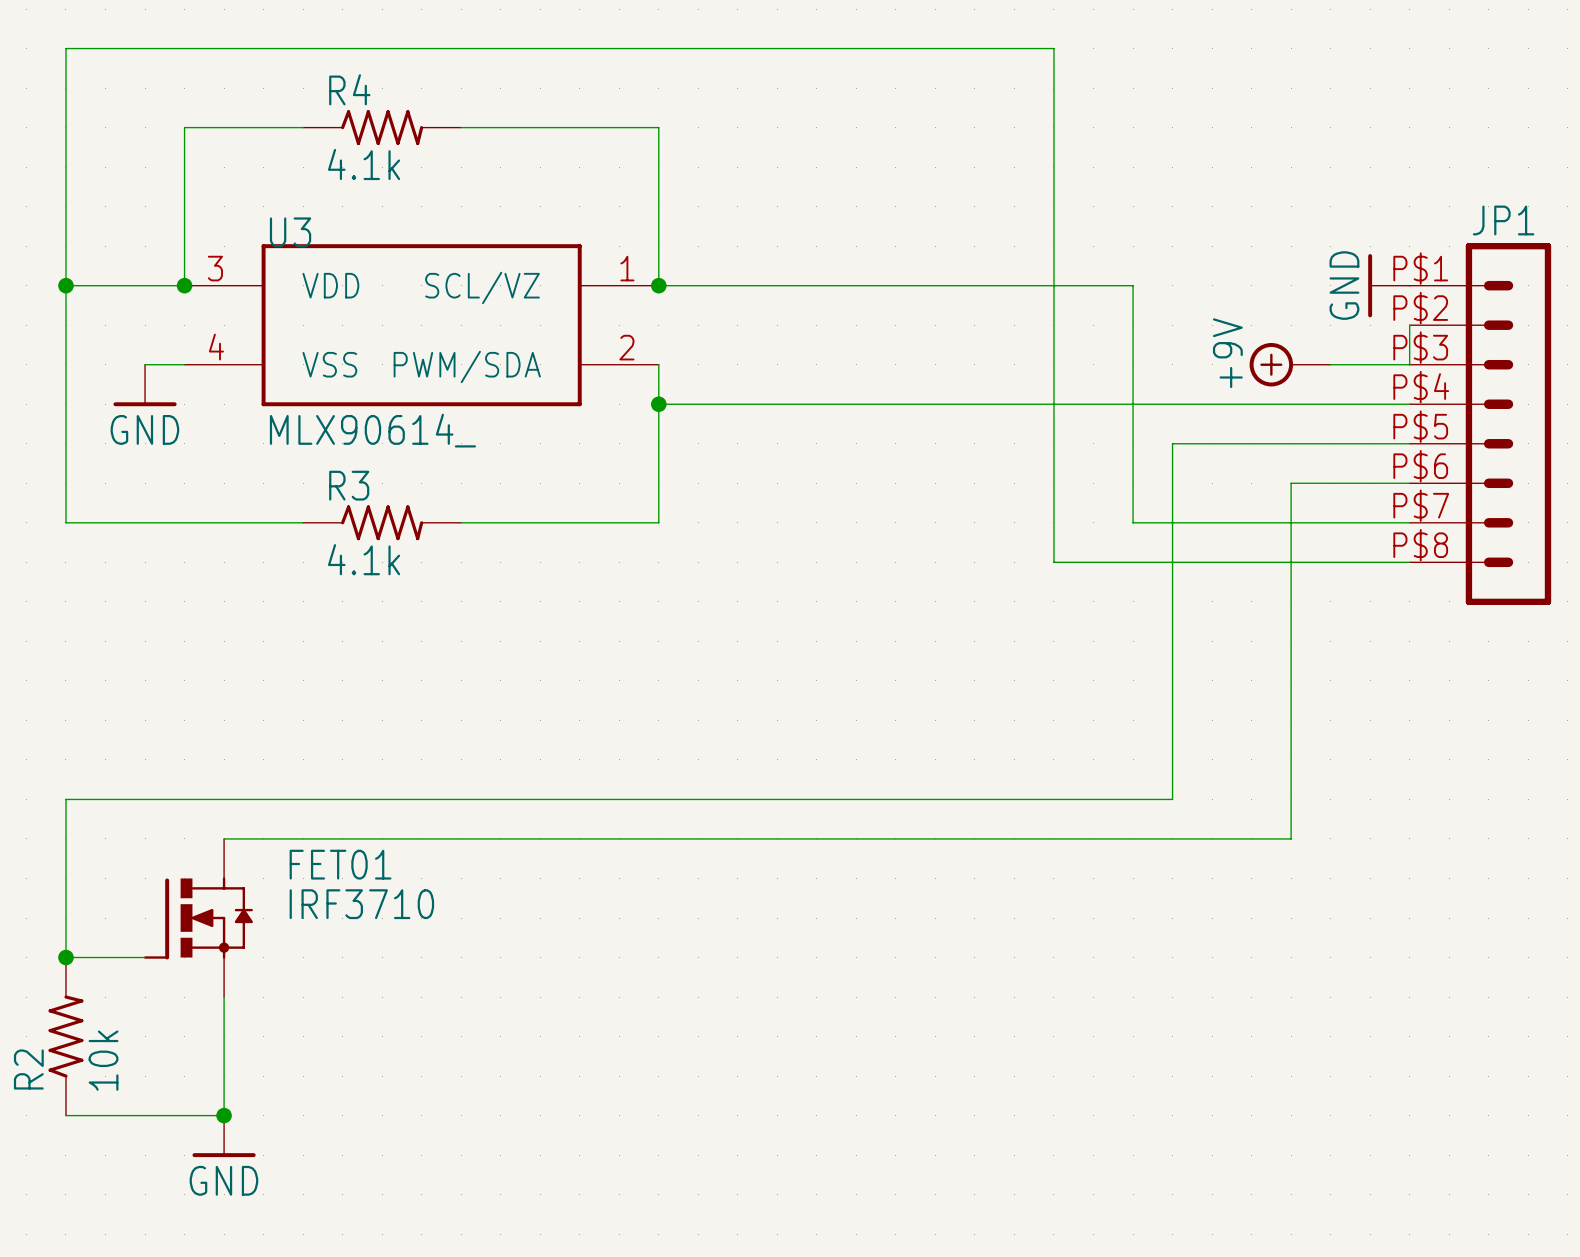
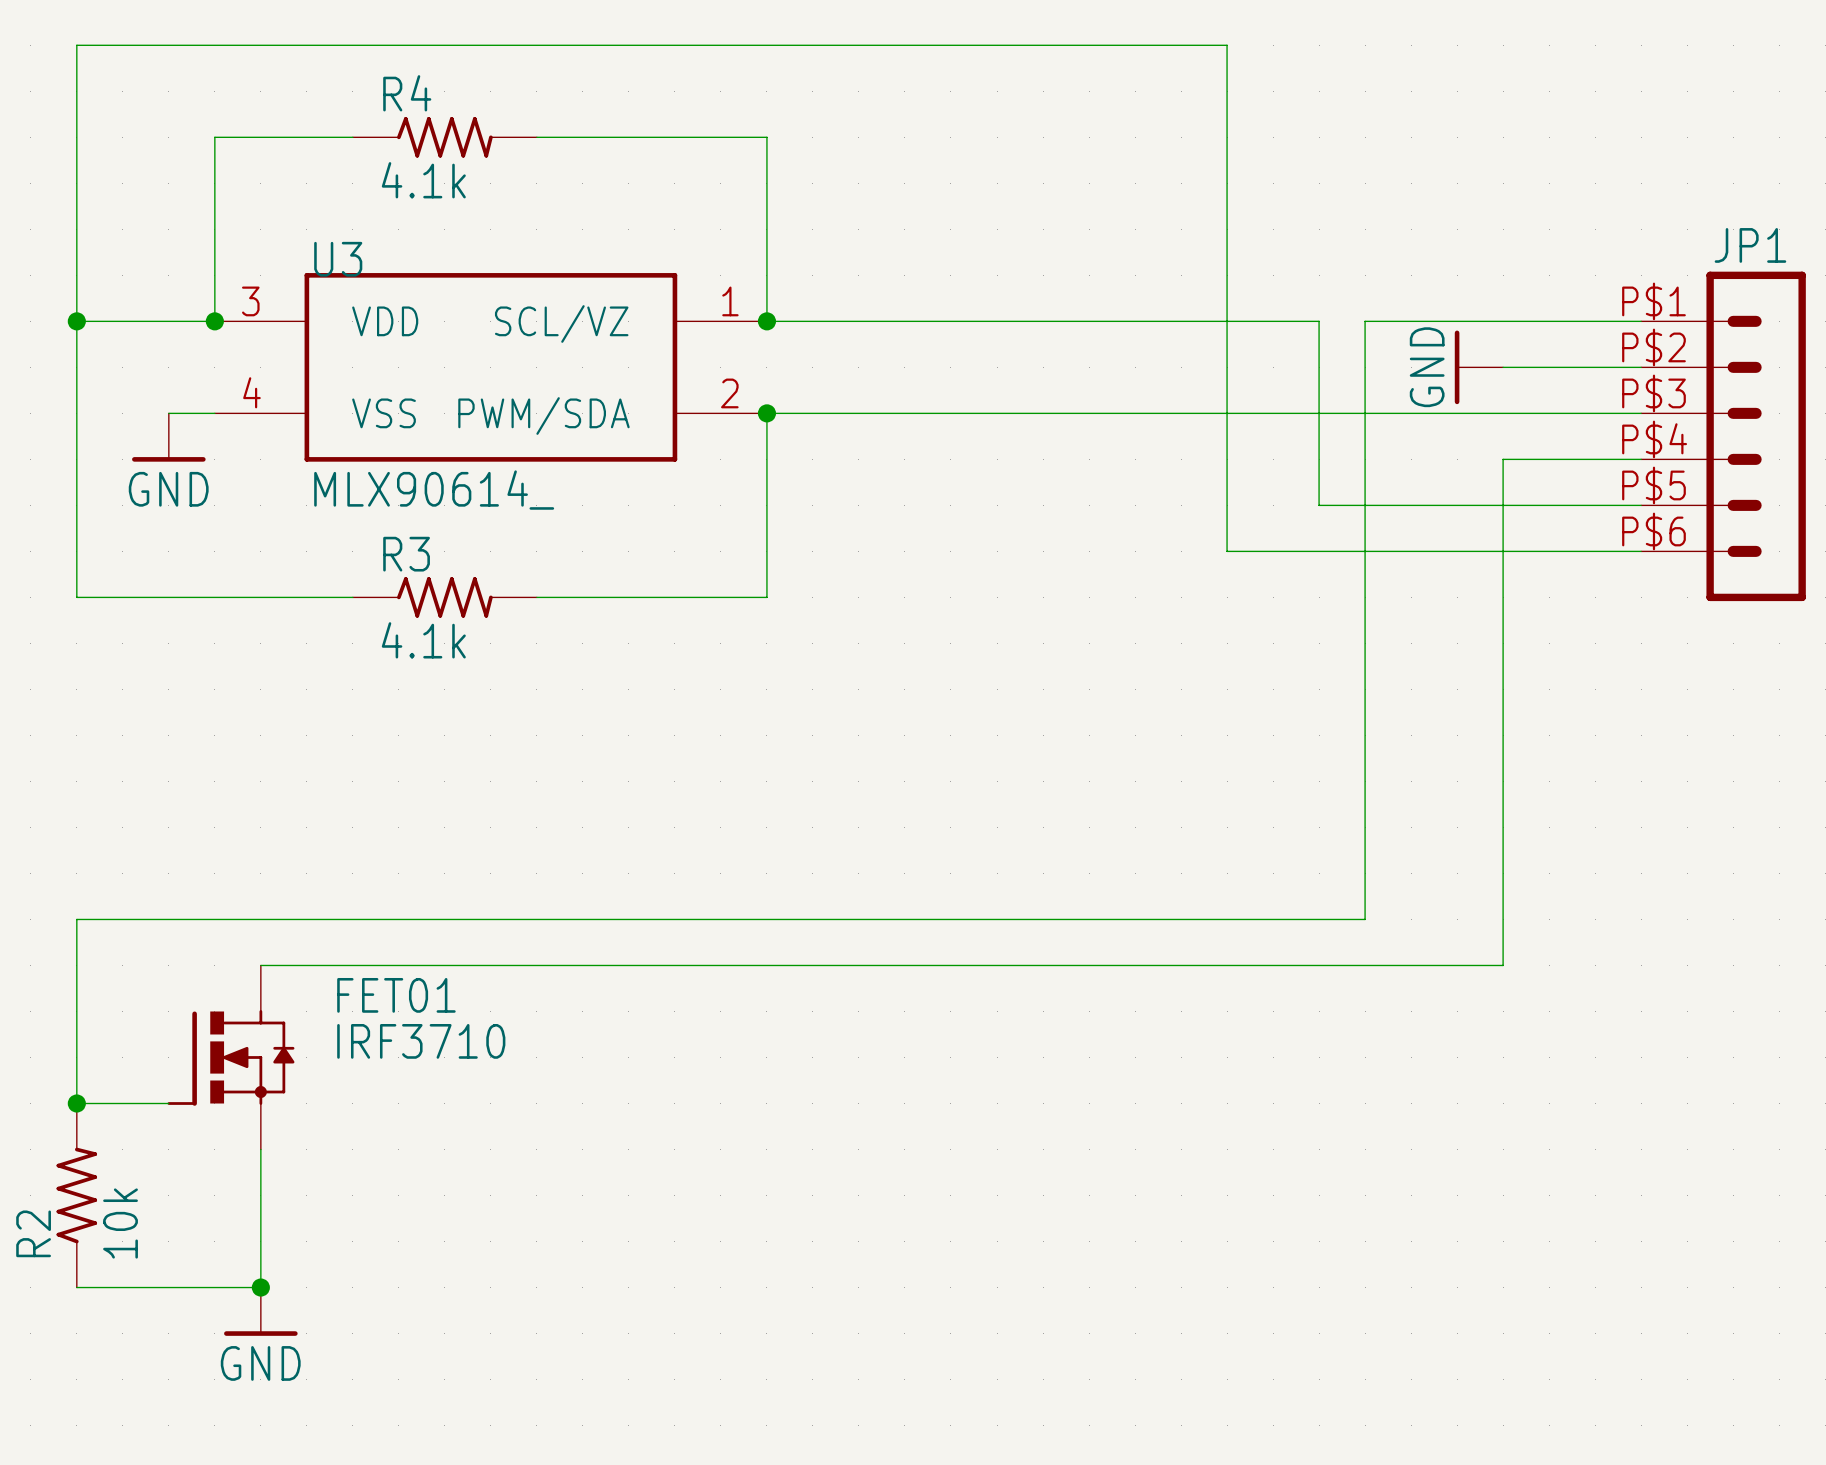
JP1 symbol: [1409, 243, 1552, 606] -> [1641, 271, 1806, 602]
power symbol position: GND (1388, 285) -> GND (1478, 367)
wire: (1409, 325) (1409, 364) -> (1641, 367) (1503, 367)
wire: none -> (766, 413) (1549, 413)
power symbol: +9V (1290, 364) -> none
wire: (658, 404) (1291, 404) -> none
junction position: (658, 404) -> (766, 413)
wire: (1133, 443) (1133, 522) (1409, 522) -> (1319, 505) (1365, 505) (1365, 321) (1641, 321)
wire: (1053, 483) (1053, 562) (1409, 562) -> (1227, 551) (1503, 551) (1503, 459)

